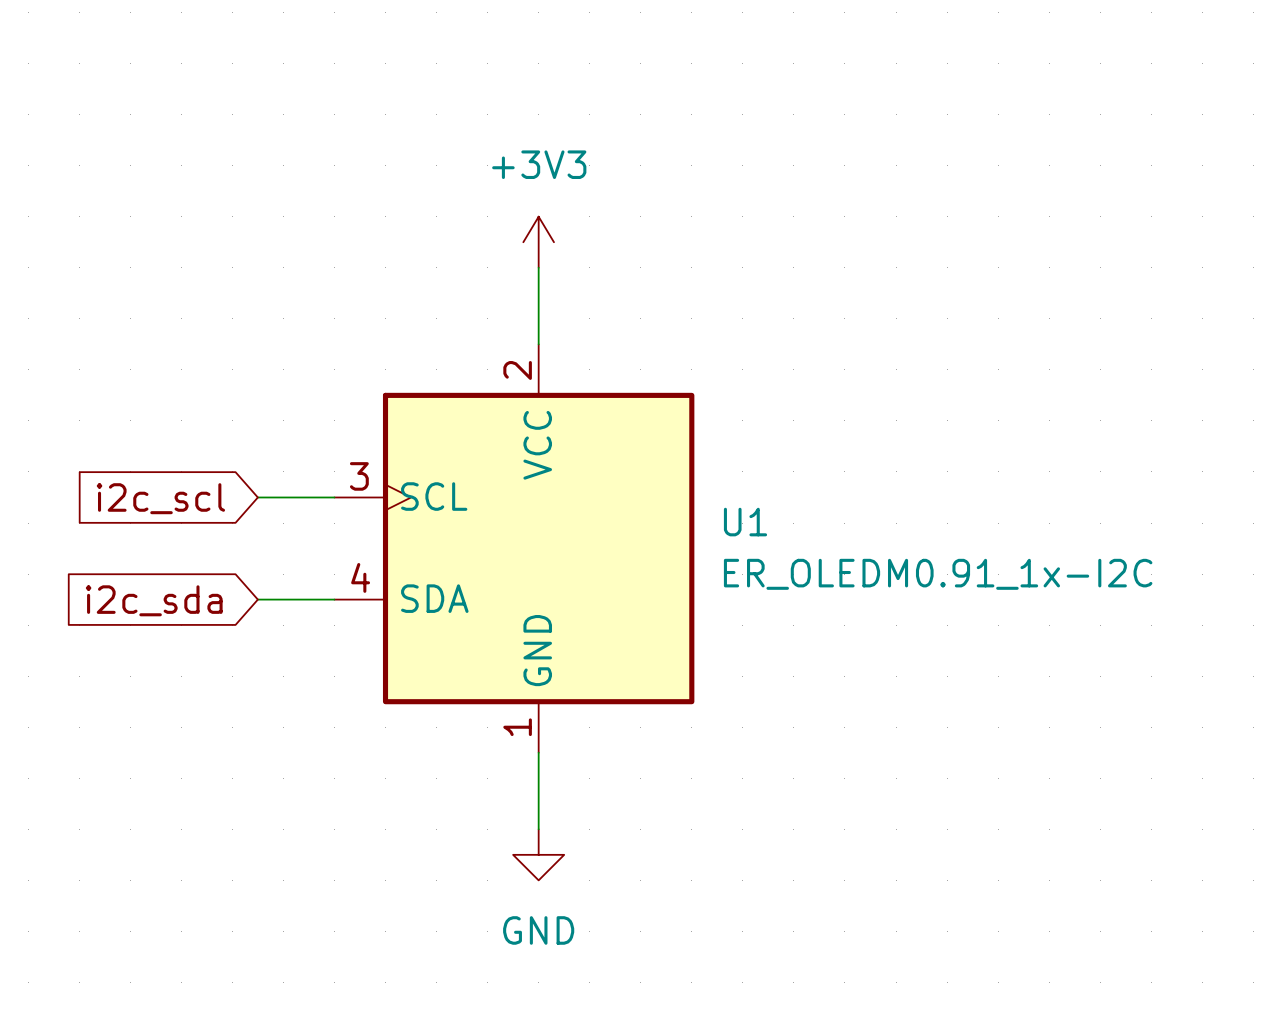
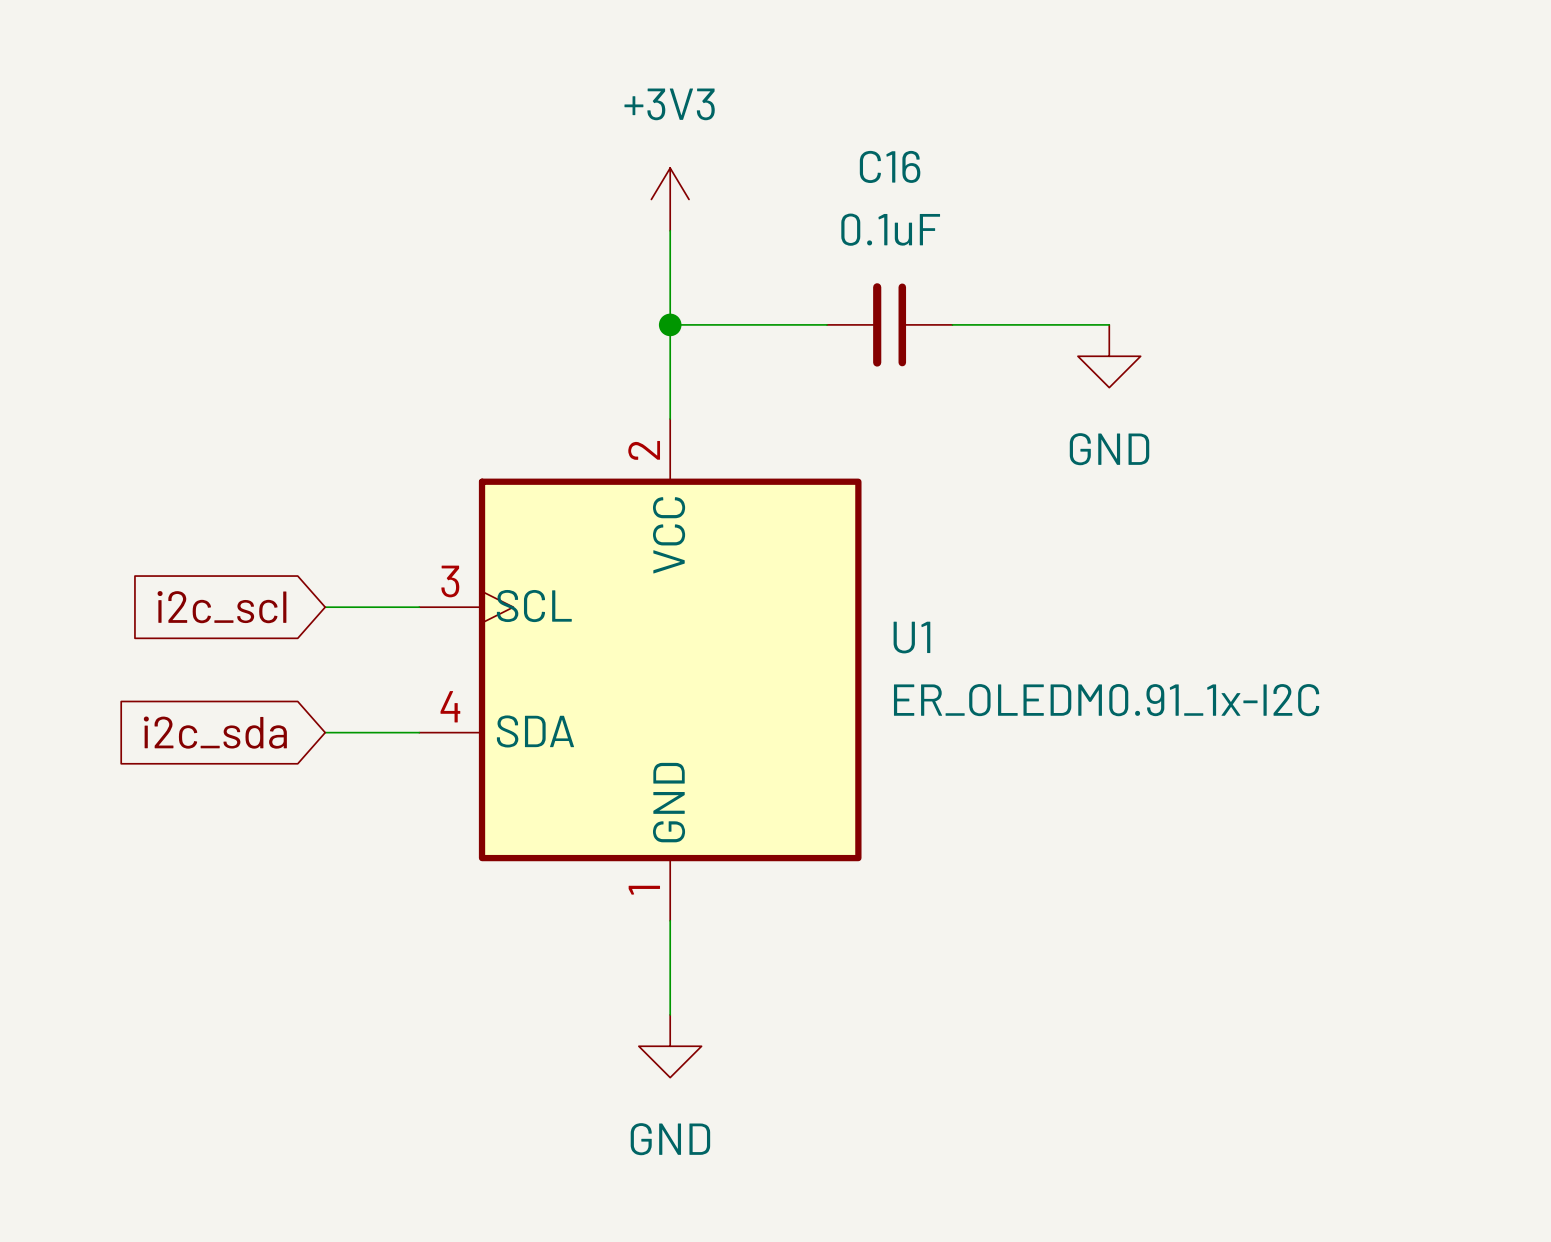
wire: none -> (670, 230) (670, 324) (827, 324)
power symbol position: +3V3 (538, 242) -> +3V3 (670, 199)
junction: none -> (670, 324)
C16: none -> 0.1uF (889, 324)
wire: none -> (952, 324) (1109, 324)
power symbol: none -> GND (1109, 356)

